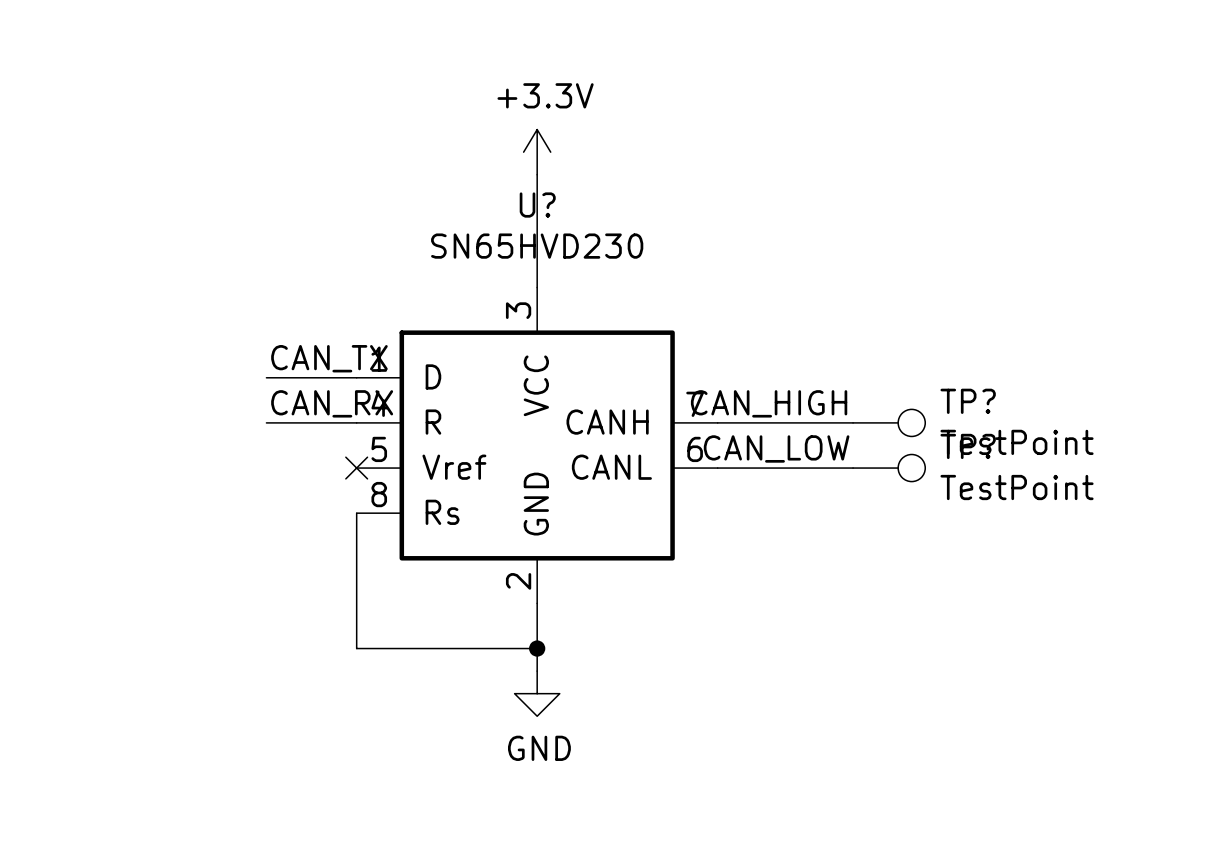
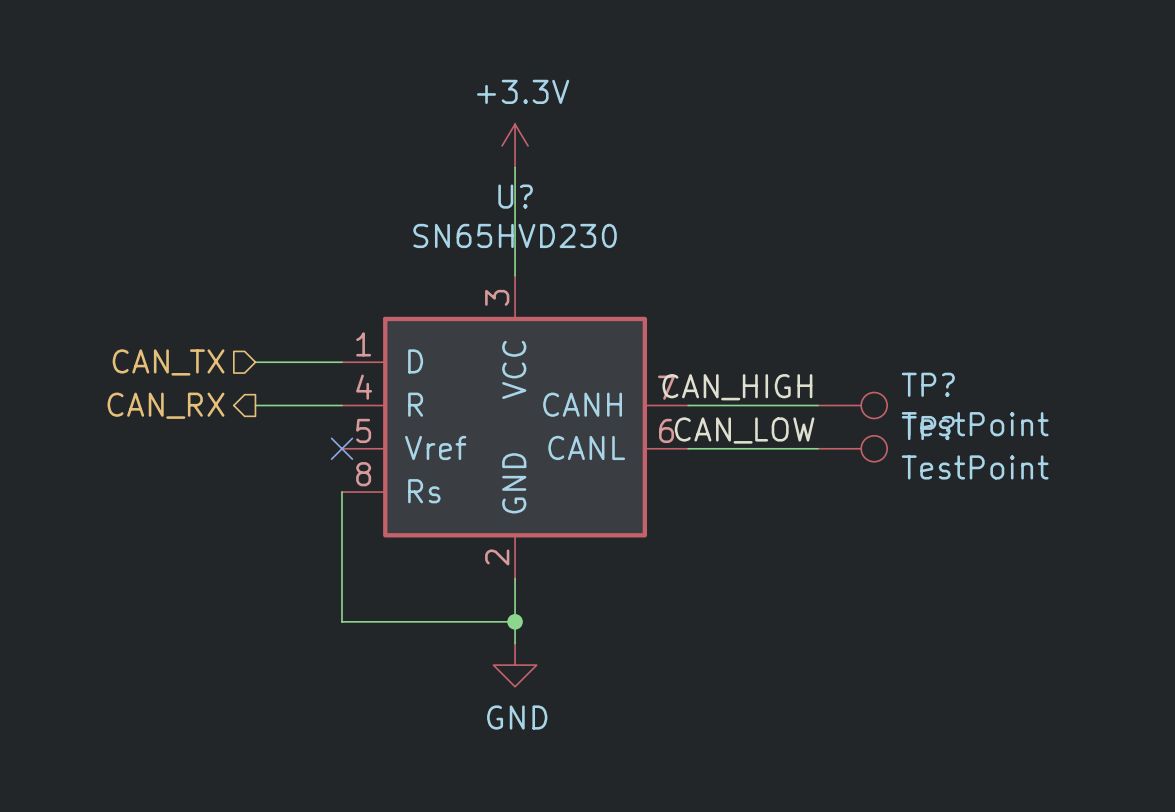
label: CAN_TX (329, 358) -> none
hierarchical label: none -> CAN_TX (168, 362)
label: CAN_RX (332, 403) -> none
hierarchical label: none -> CAN_RX (166, 405)

